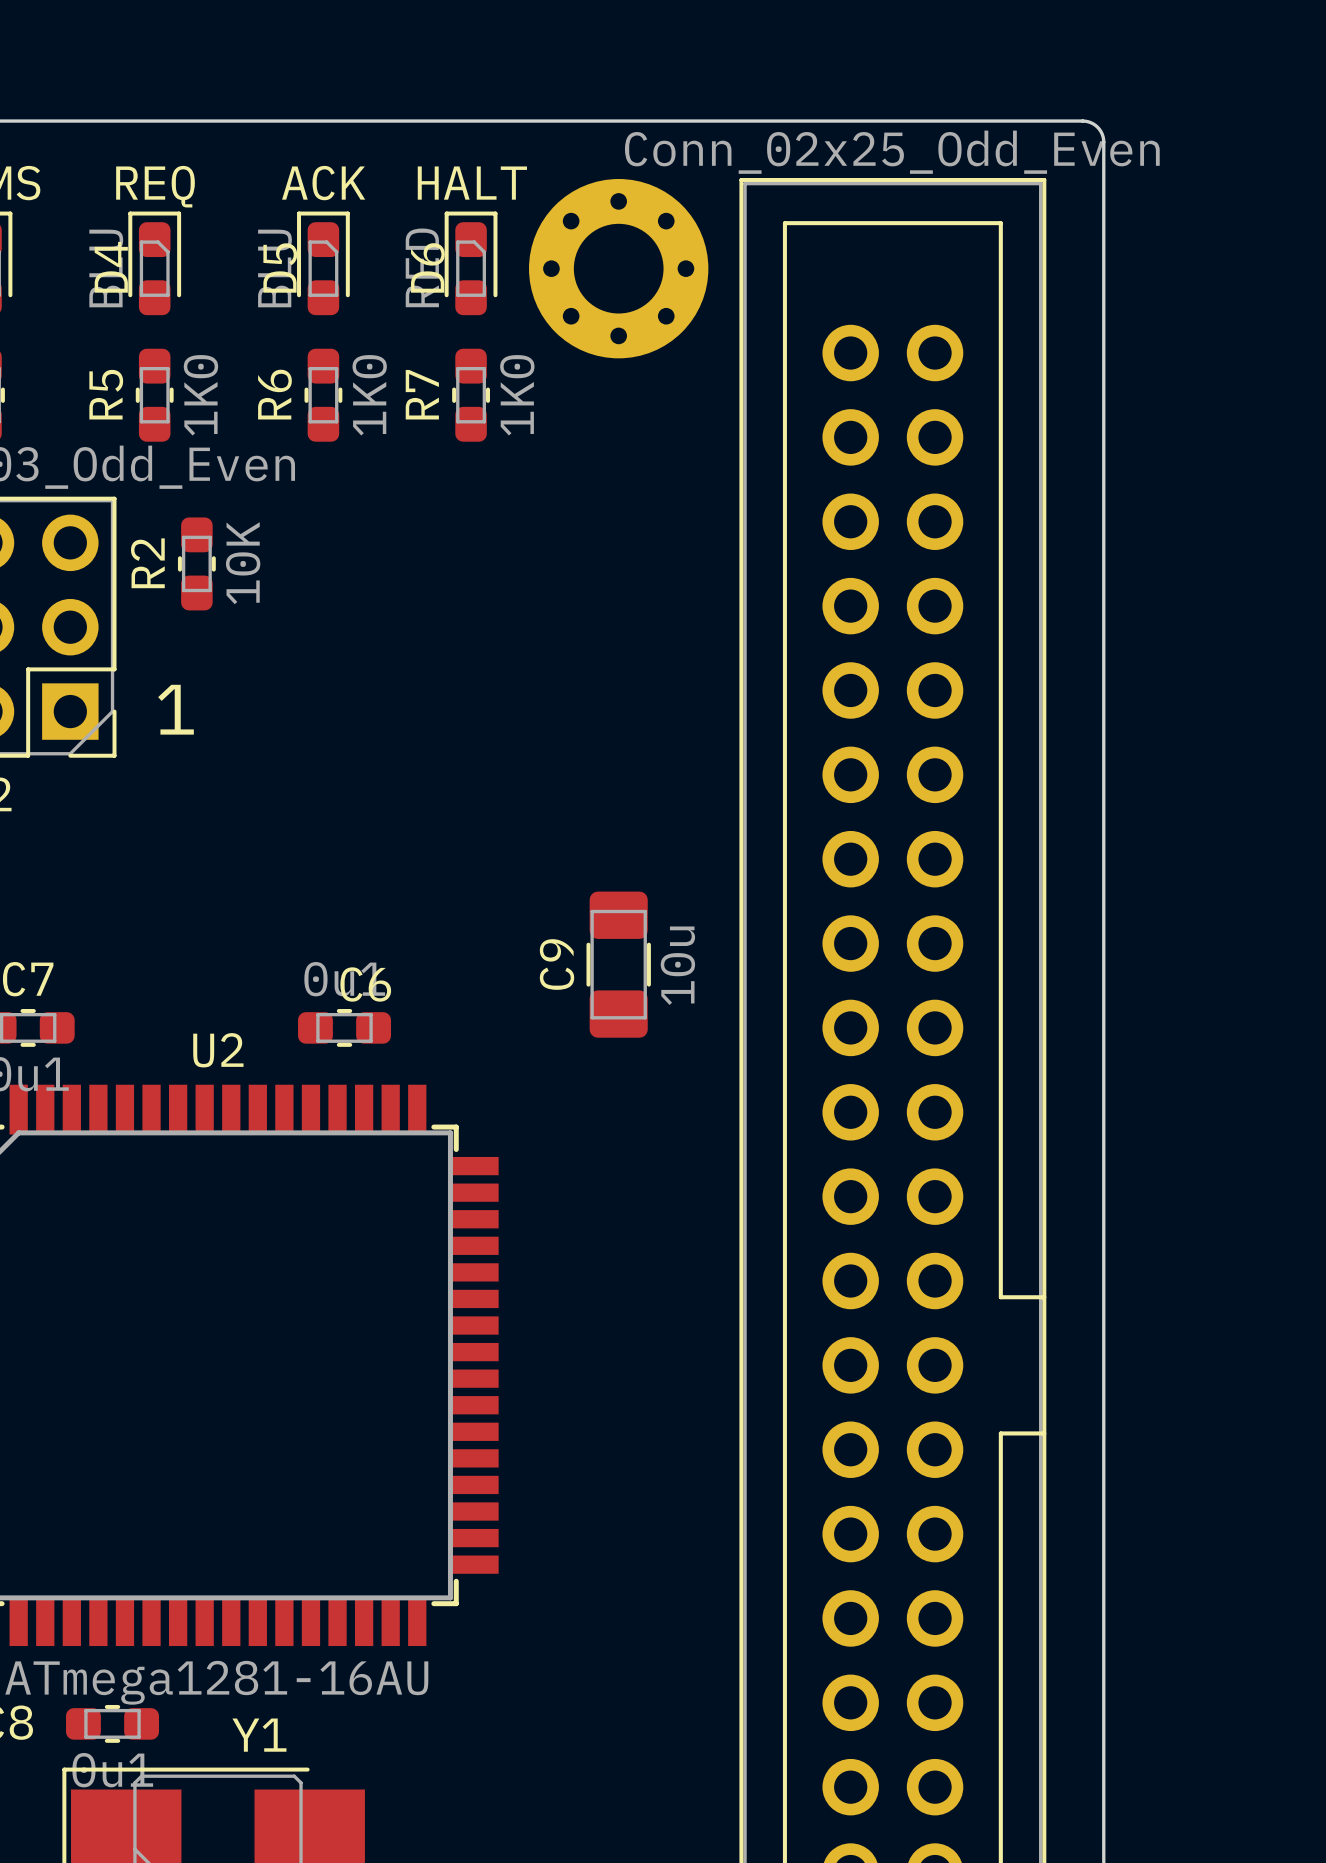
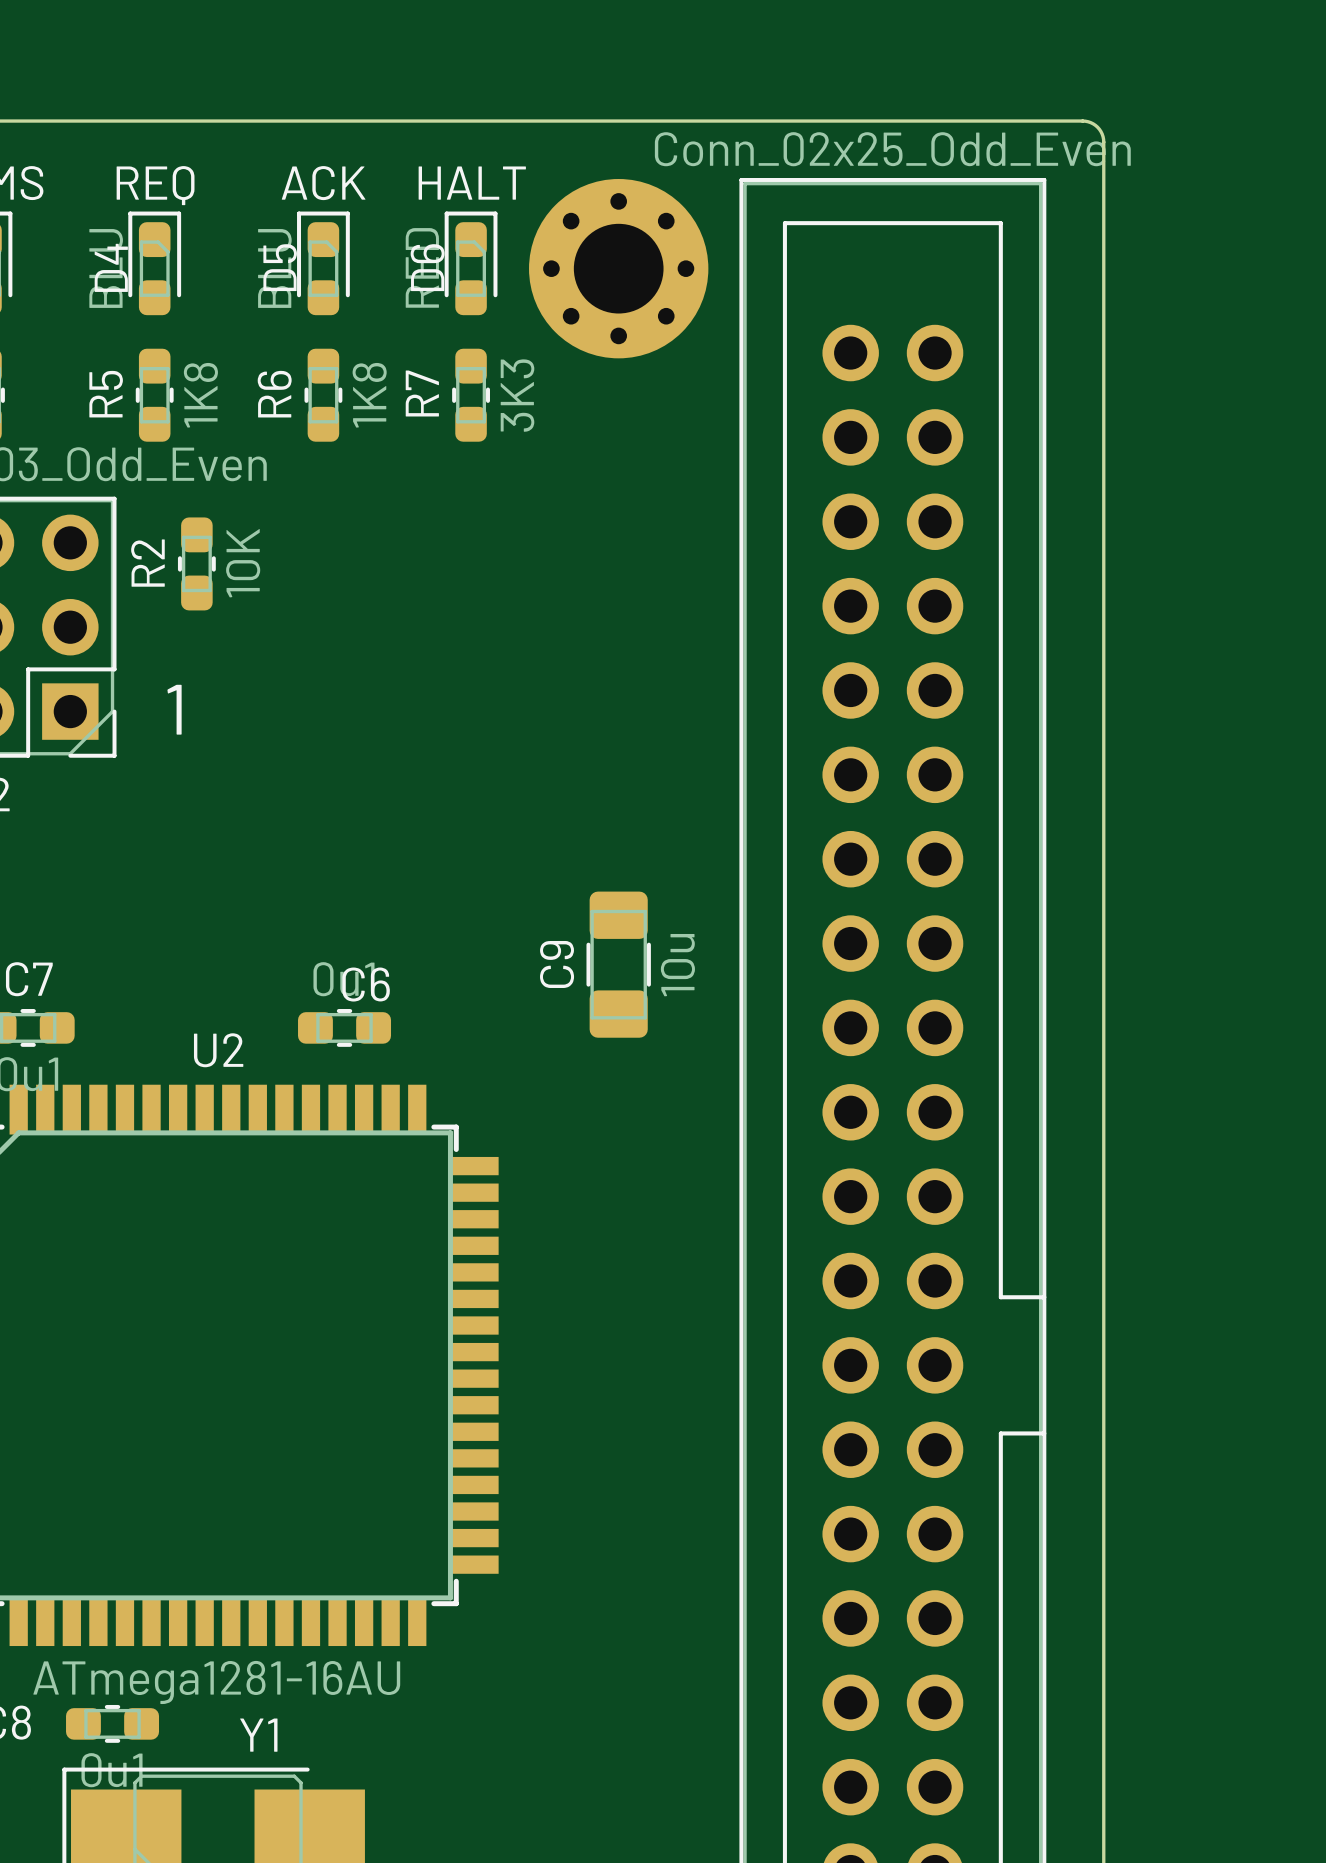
R5 value: 1K0 (200, 395) -> 1K8 (200, 395)
R6 value: 1K0 (369, 395) -> 1K8 (369, 395)
R7 value: 1K0 (517, 395) -> 3K3 (517, 395)

